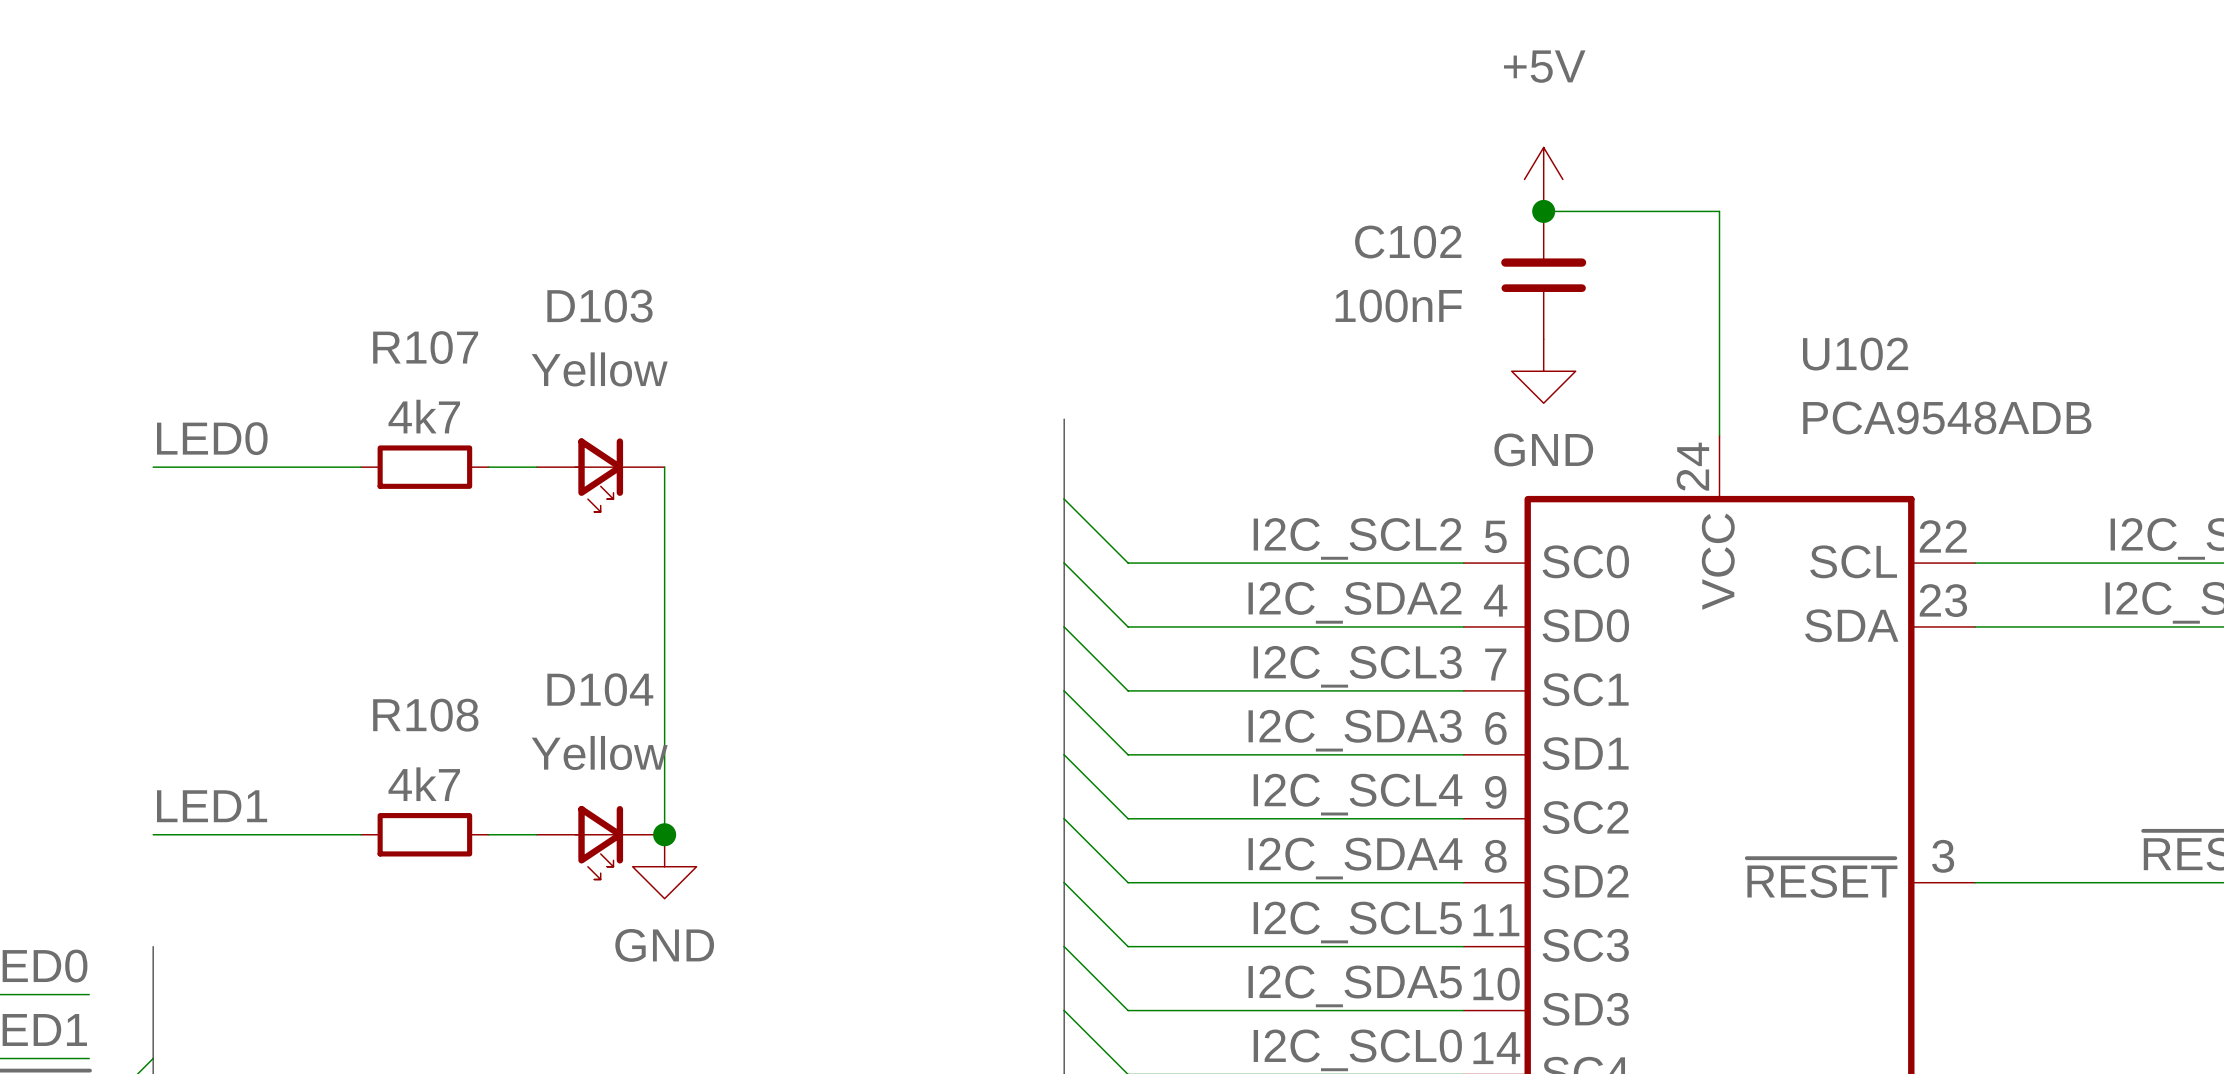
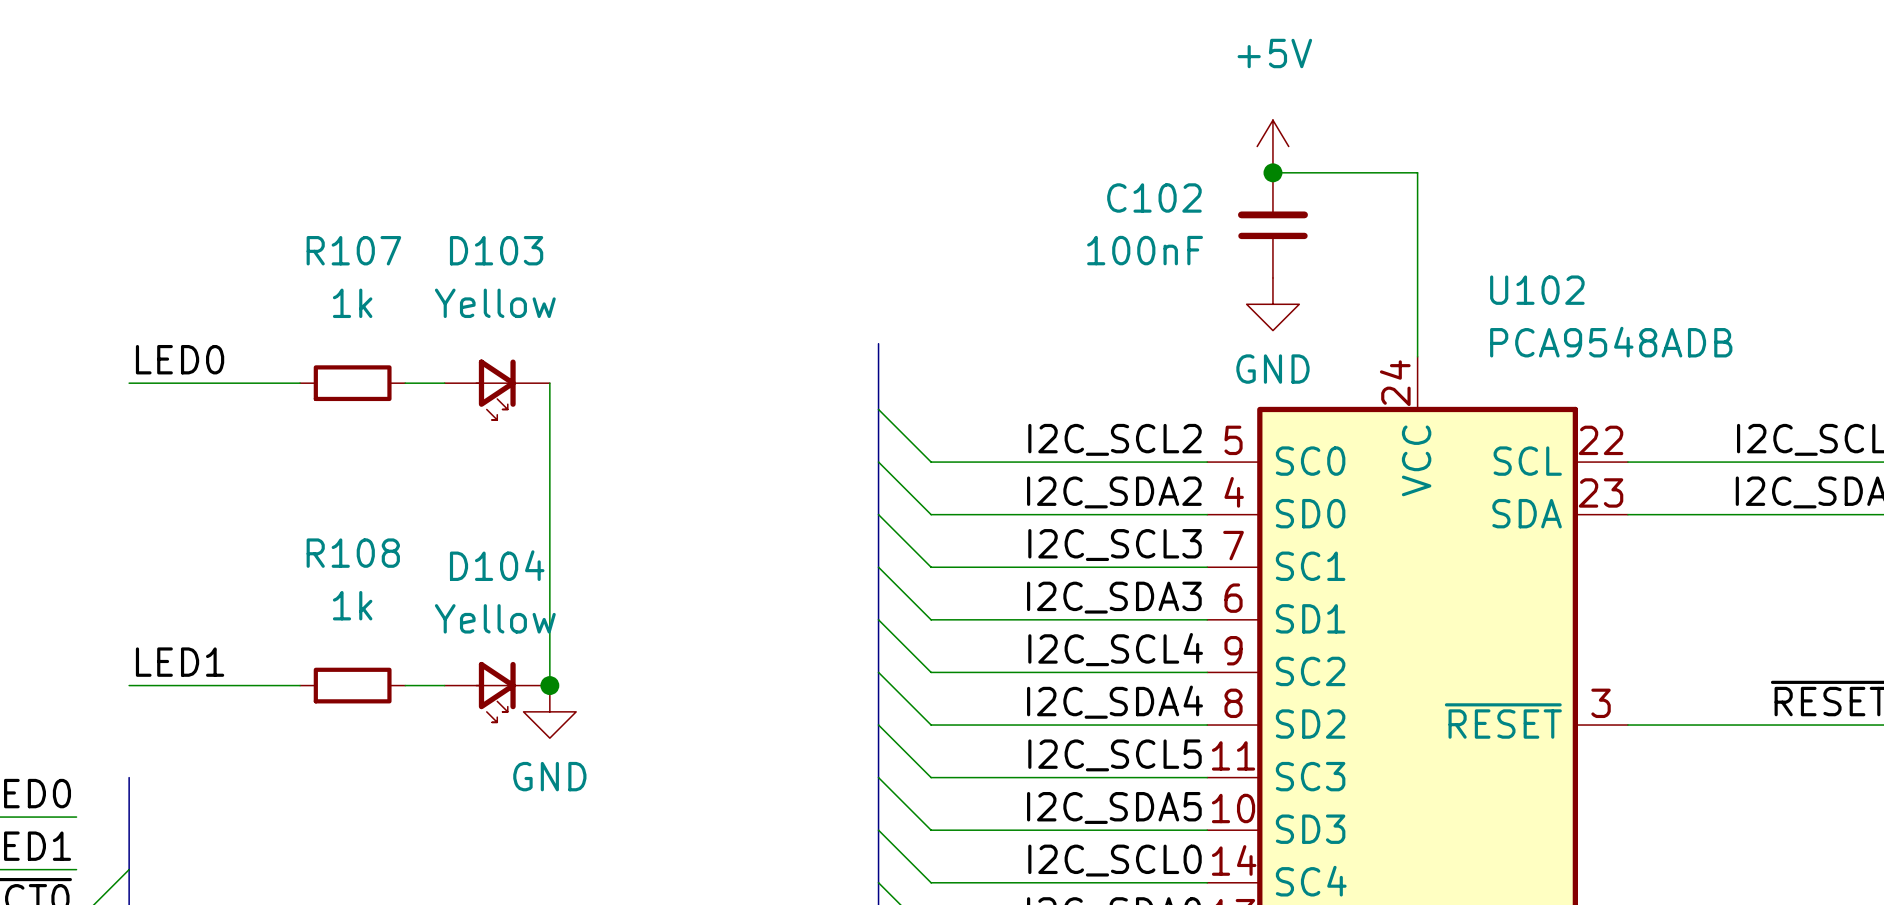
R107 name position: R107 (425, 347) -> R107 (353, 250)
R107 value: 4k7 (424, 416) -> 1k (352, 303)
R108 name position: R108 (425, 715) -> R108 (353, 553)
R108 value: 4k7 (424, 784) -> 1k (352, 605)

